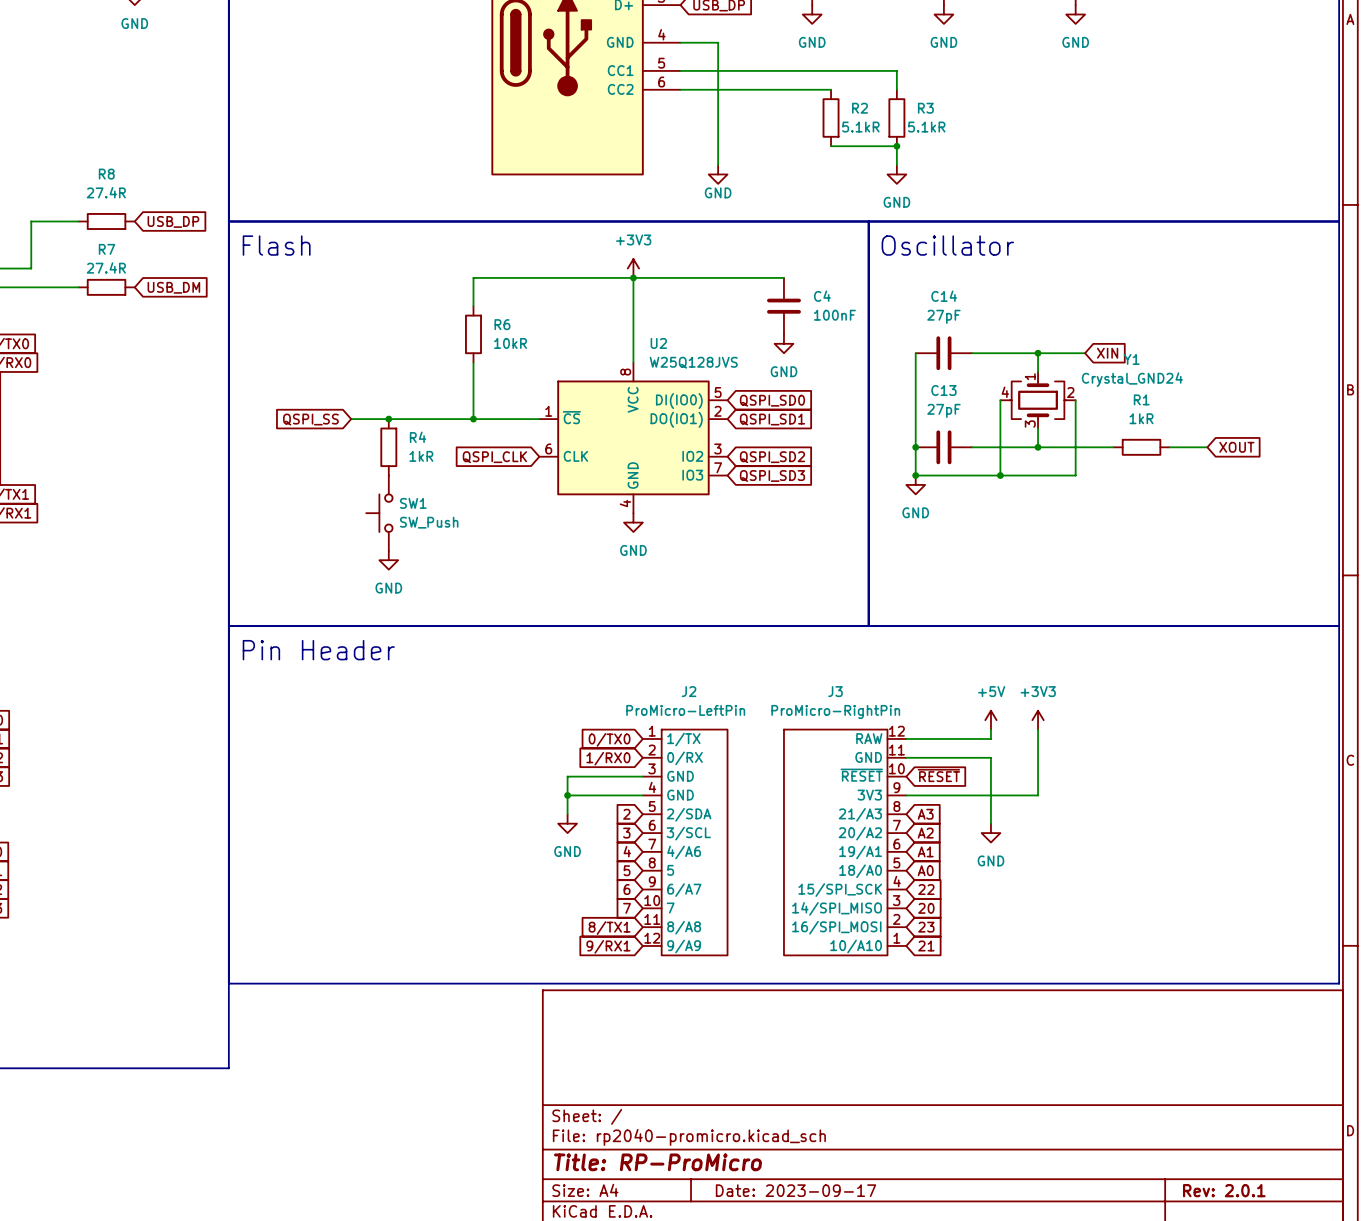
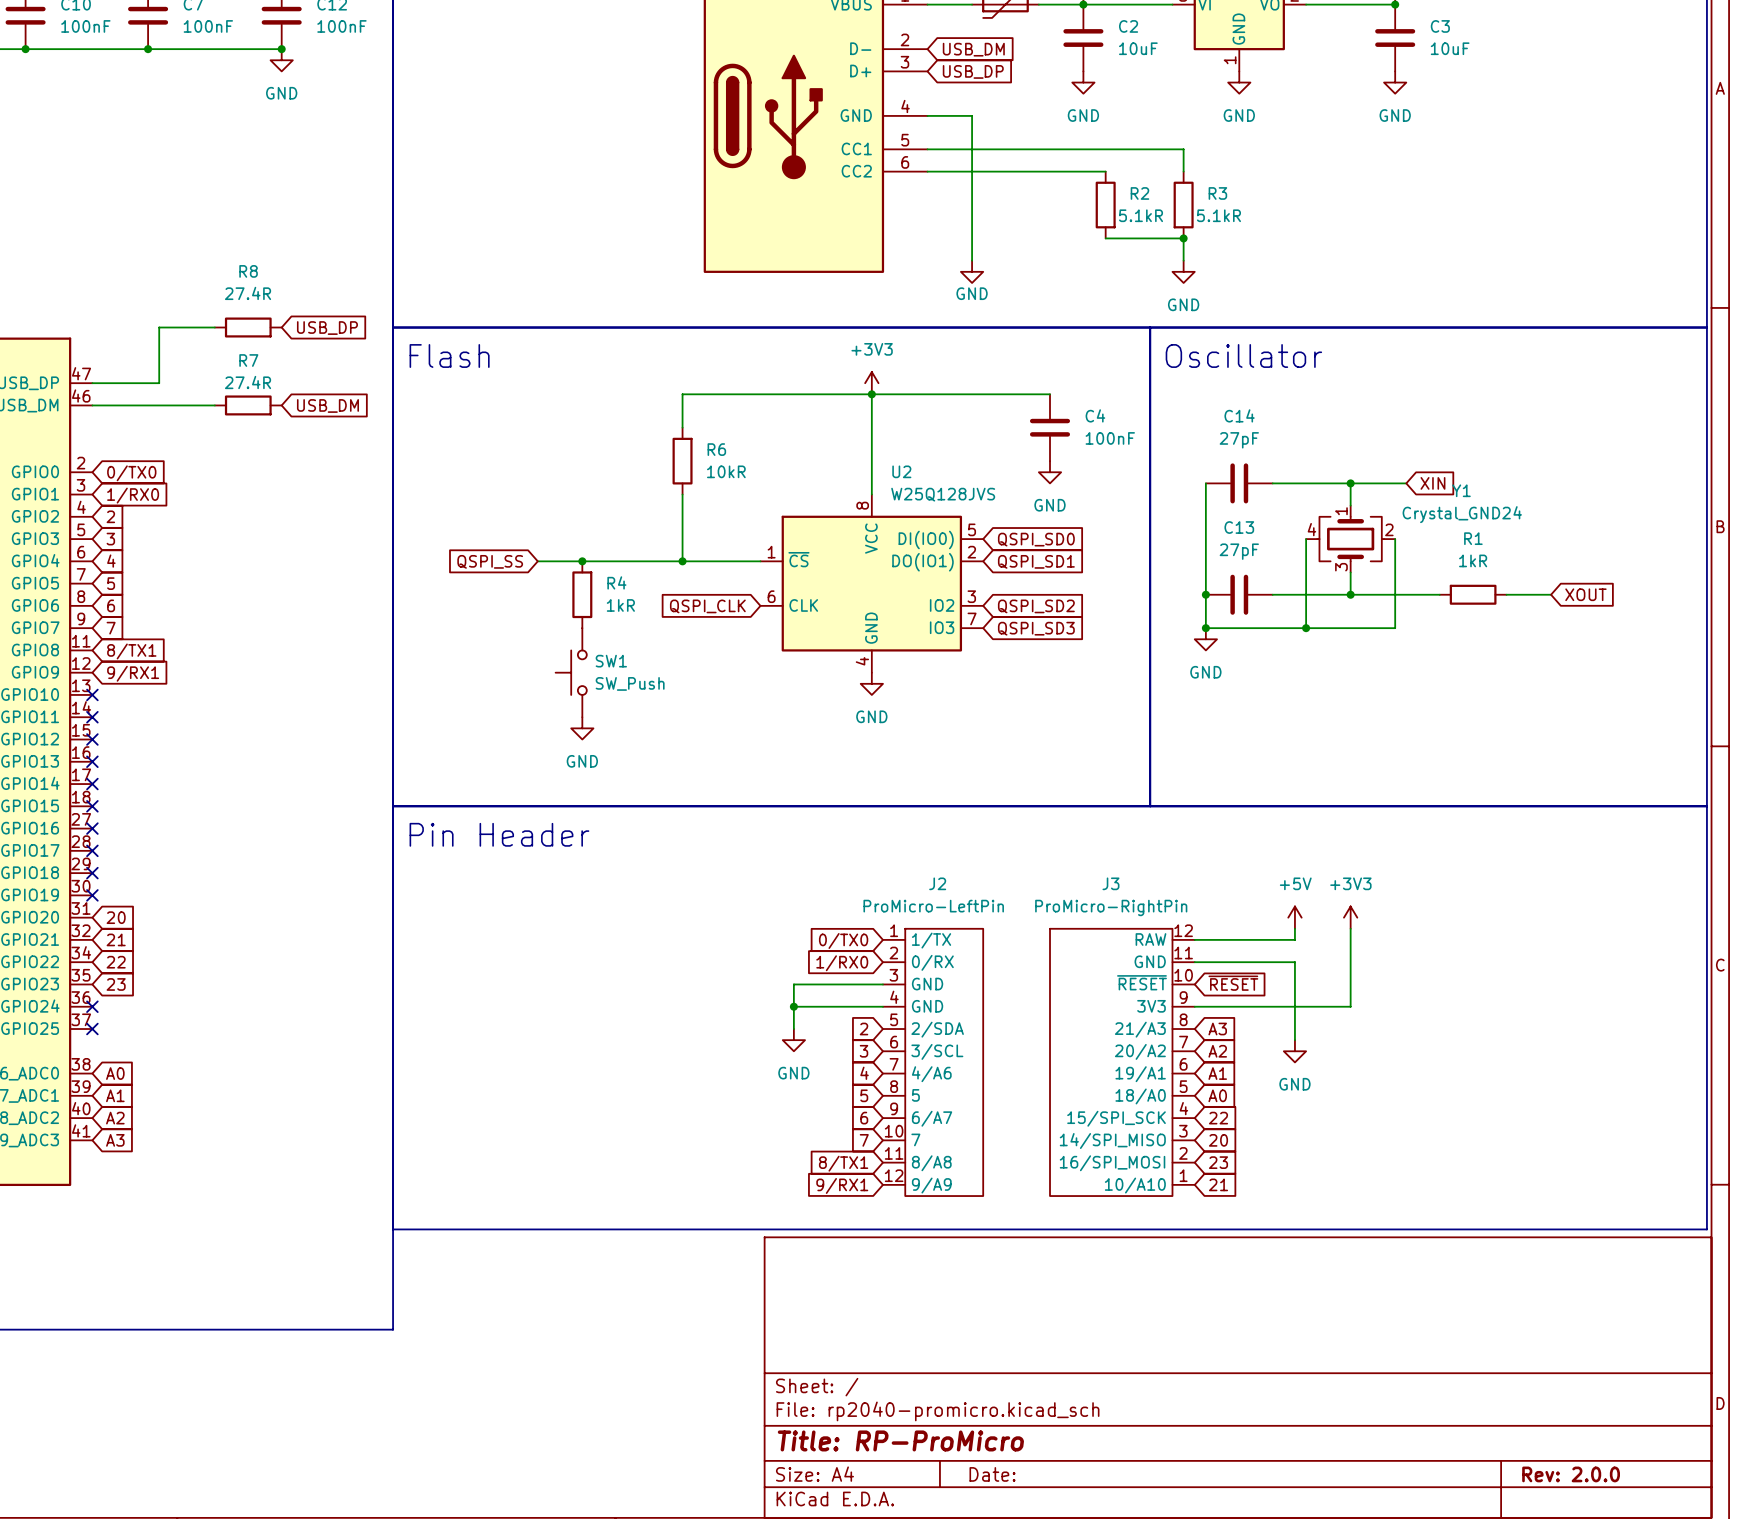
title block: Date: 2023-09-17 (796, 1190) -> Date: (992, 1474)
title block: Rev: 2.0.1 (1224, 1190) -> Rev: 2.0.0 (1571, 1474)

